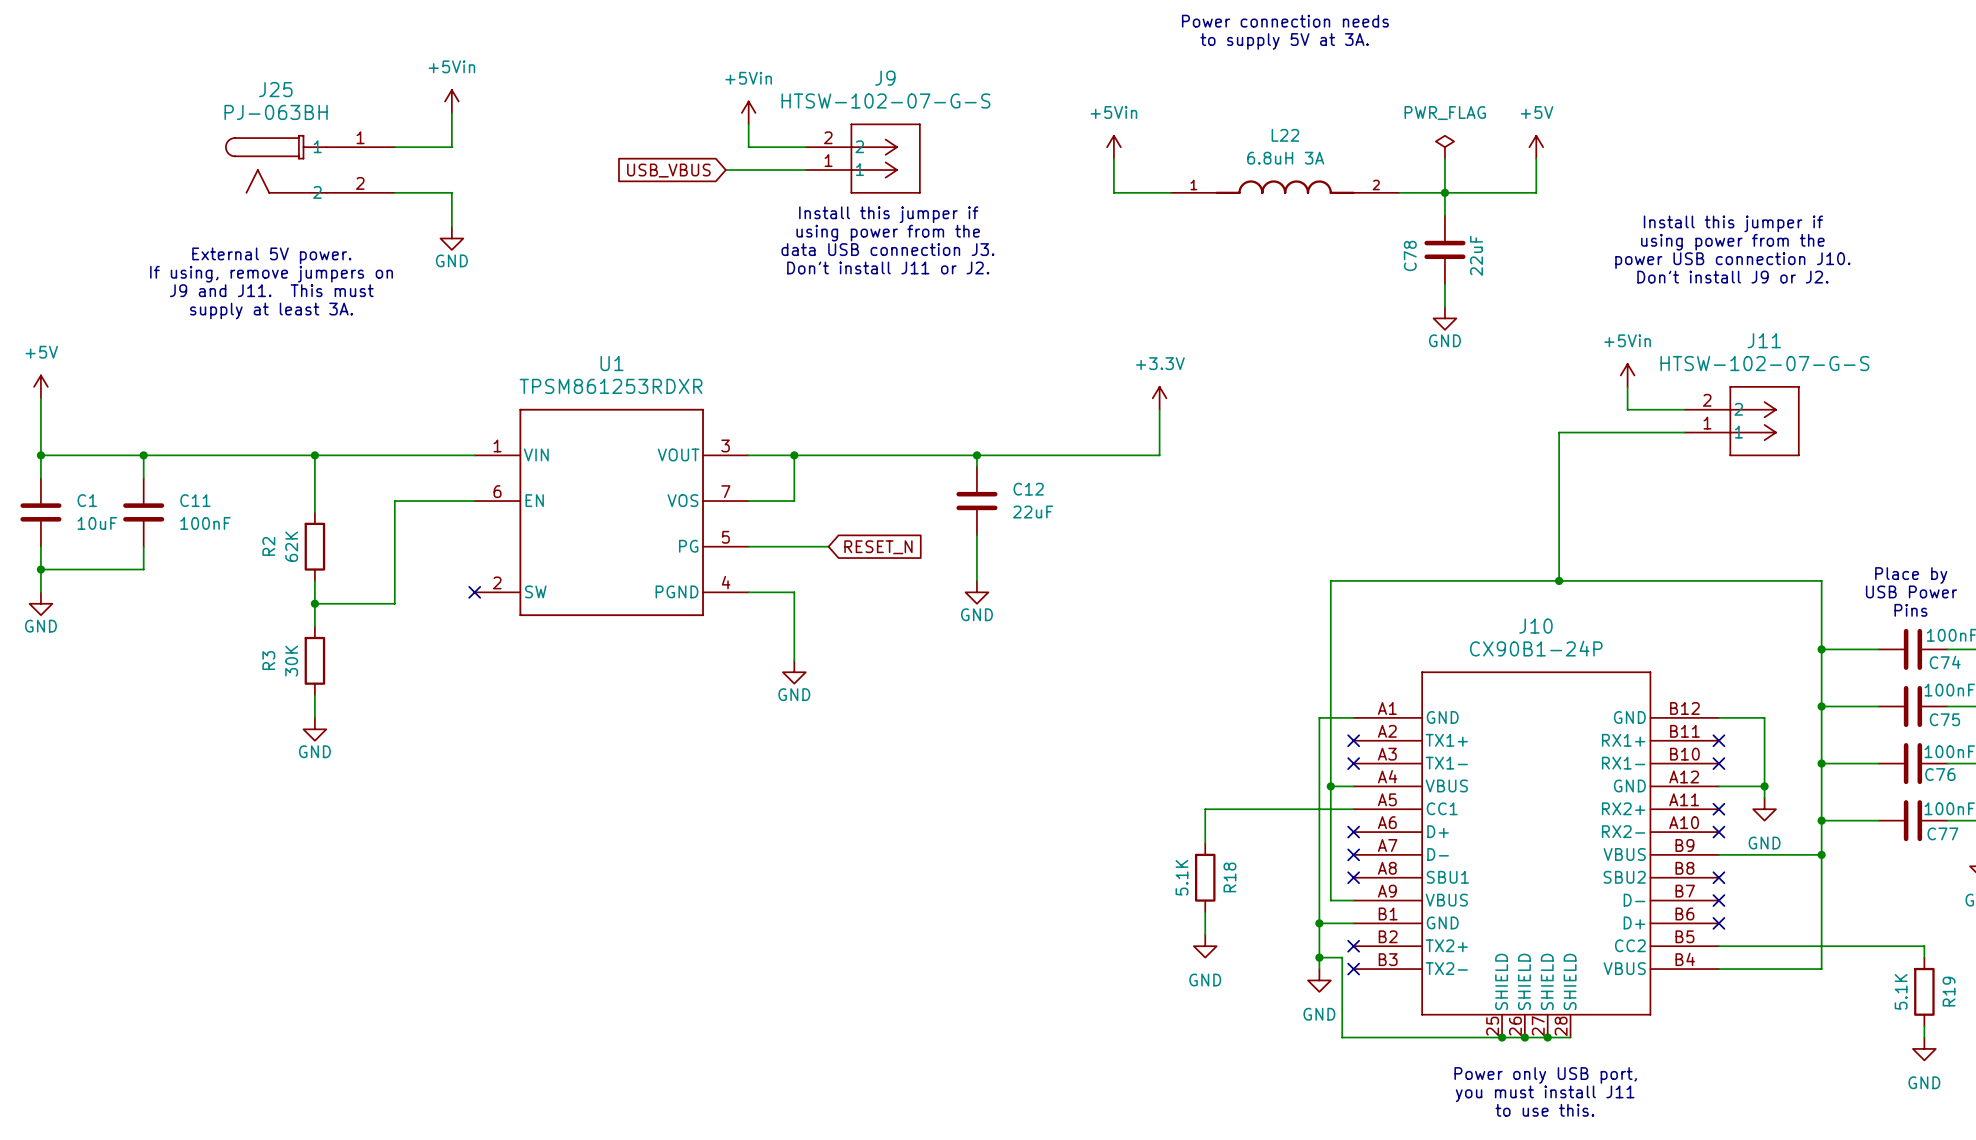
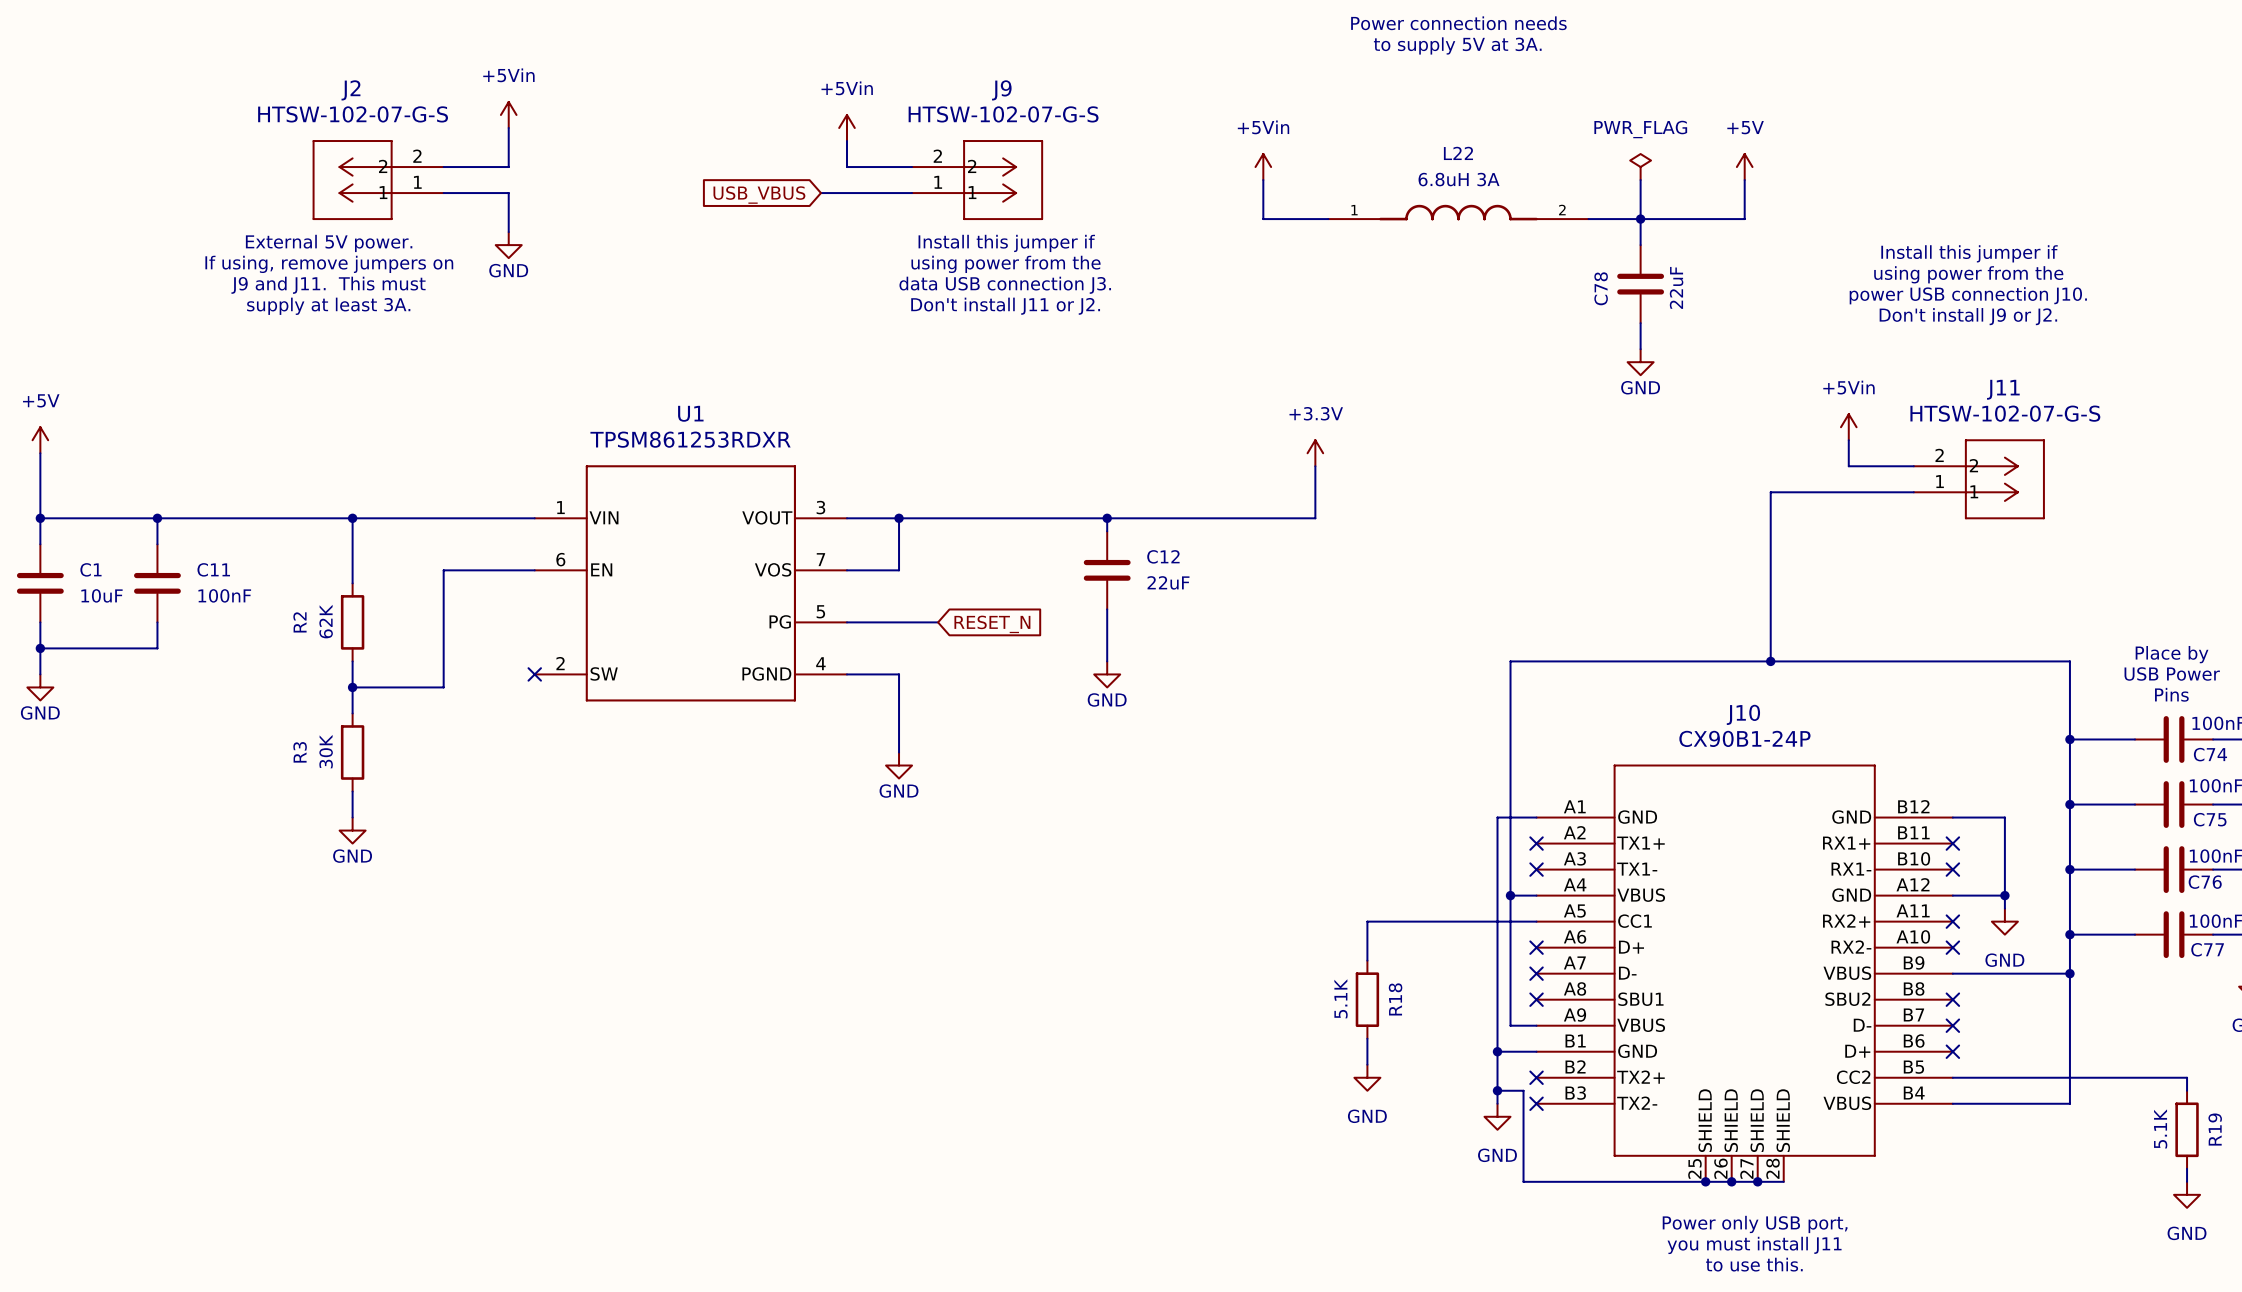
J2: none -> HTSW-102-07-G-S (378, 180)
J25: PJ-063BH (310, 164) -> none
wire: (394, 192) (451, 192) -> (443, 193) (508, 193) (508, 219)
power symbol position: GND (451, 238) -> GND (508, 245)
text position: External 5V power. (271, 255) -> External 5V power. (329, 243)
text position: If using, remove jumpers on (271, 274) -> If using, remove jumpers on (329, 264)
text position: J9 and J11. This must (271, 290) -> J9 and J11. This must (328, 285)
text position: supply at least 3A. (271, 310) -> supply at least 3A. (328, 306)

